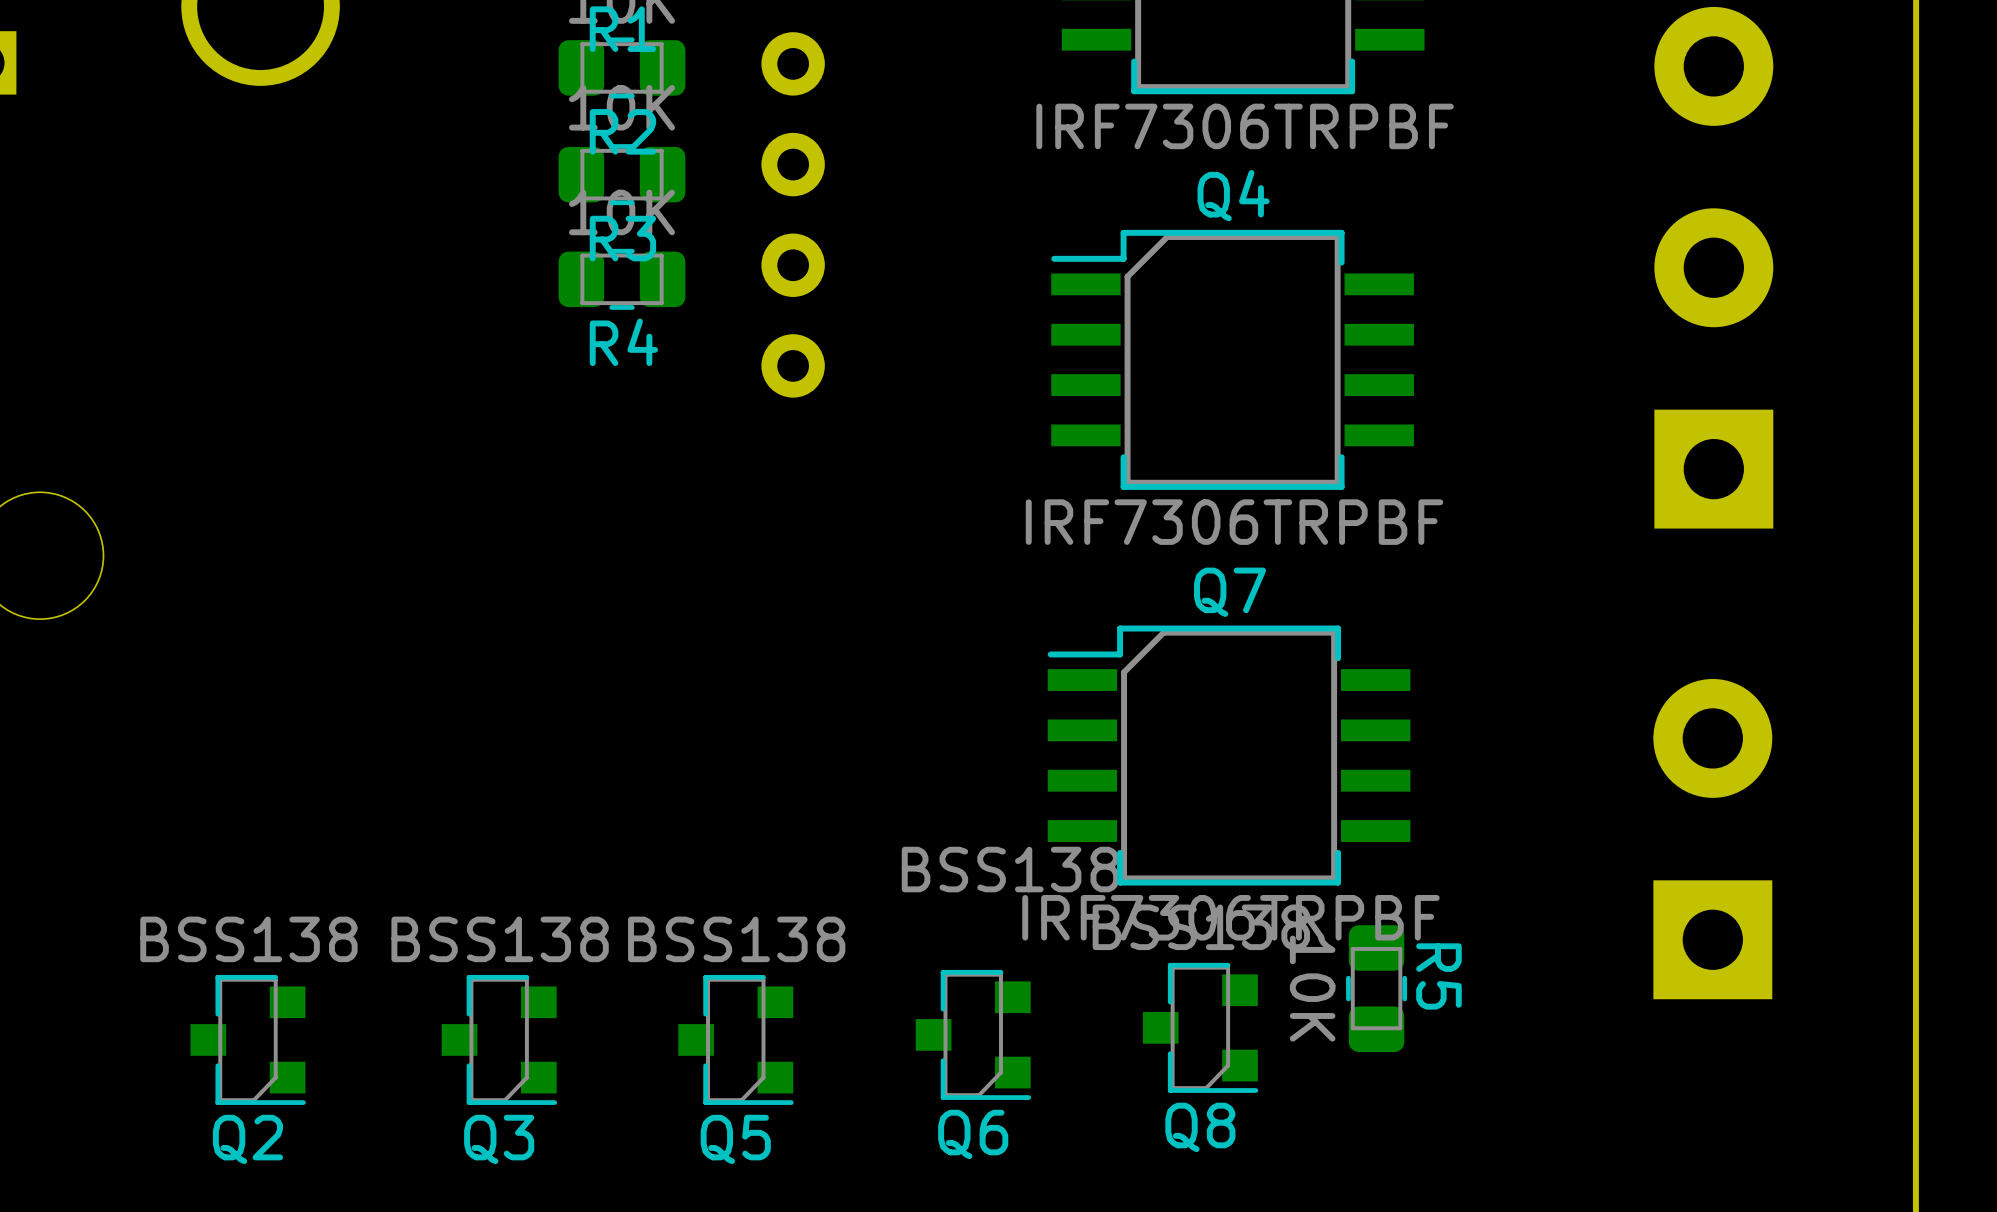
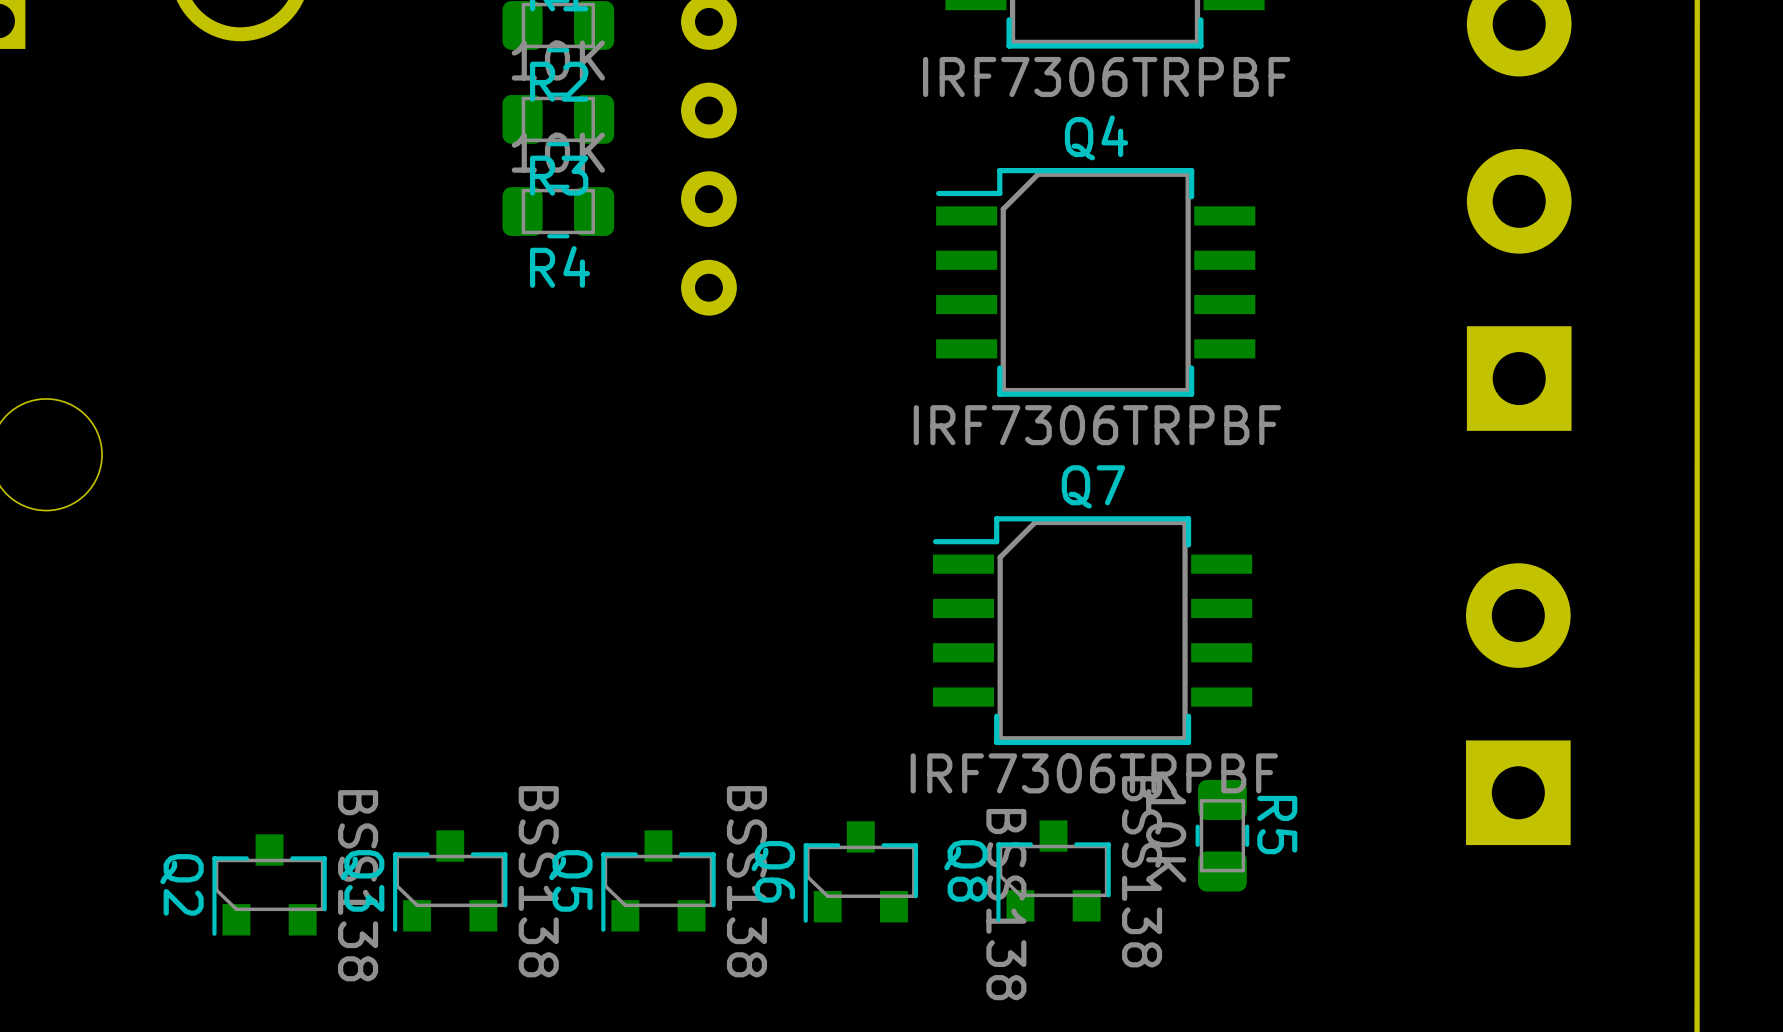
Q8 rotation: 0° (1200, 1027) -> 90° clockwise (1053, 871)
Q6 rotation: 0° (973, 1034) -> 90° clockwise (860, 871)
Q2 rotation: 0° (248, 1039) -> 90° clockwise (269, 885)
Q3 rotation: 0° (499, 1039) -> 90° clockwise (450, 881)
Q5 rotation: 0° (735, 1039) -> 90° clockwise (658, 881)

